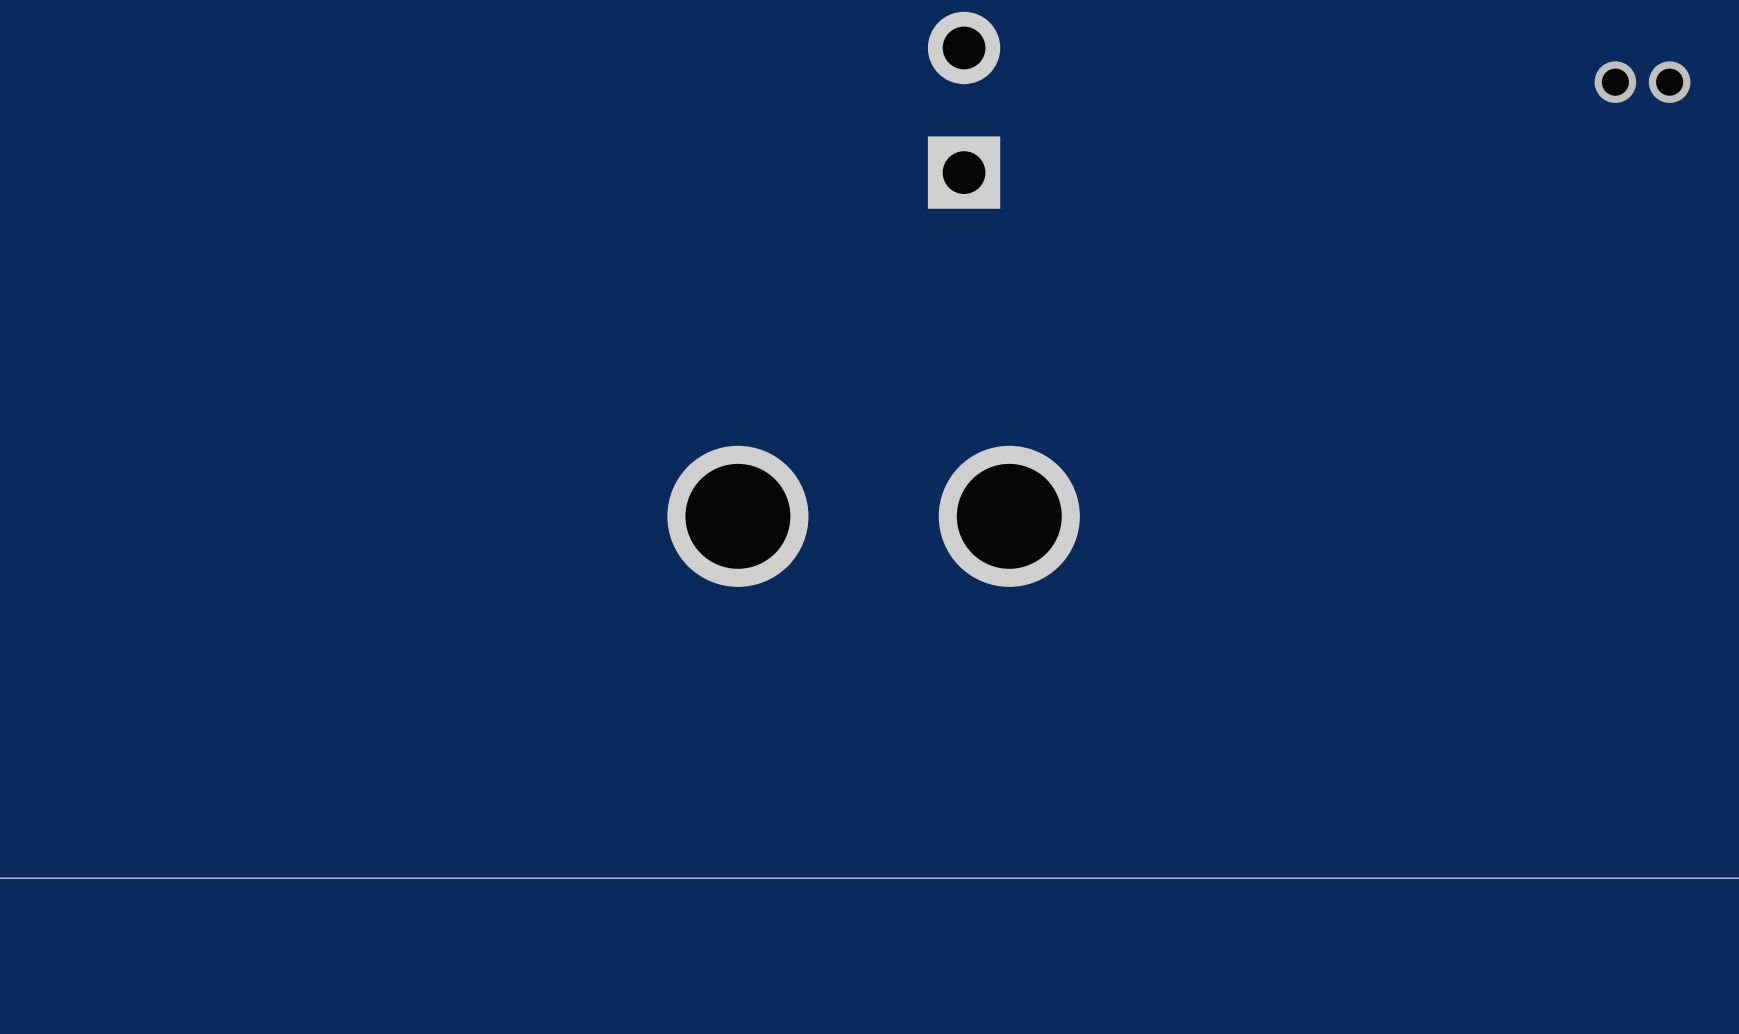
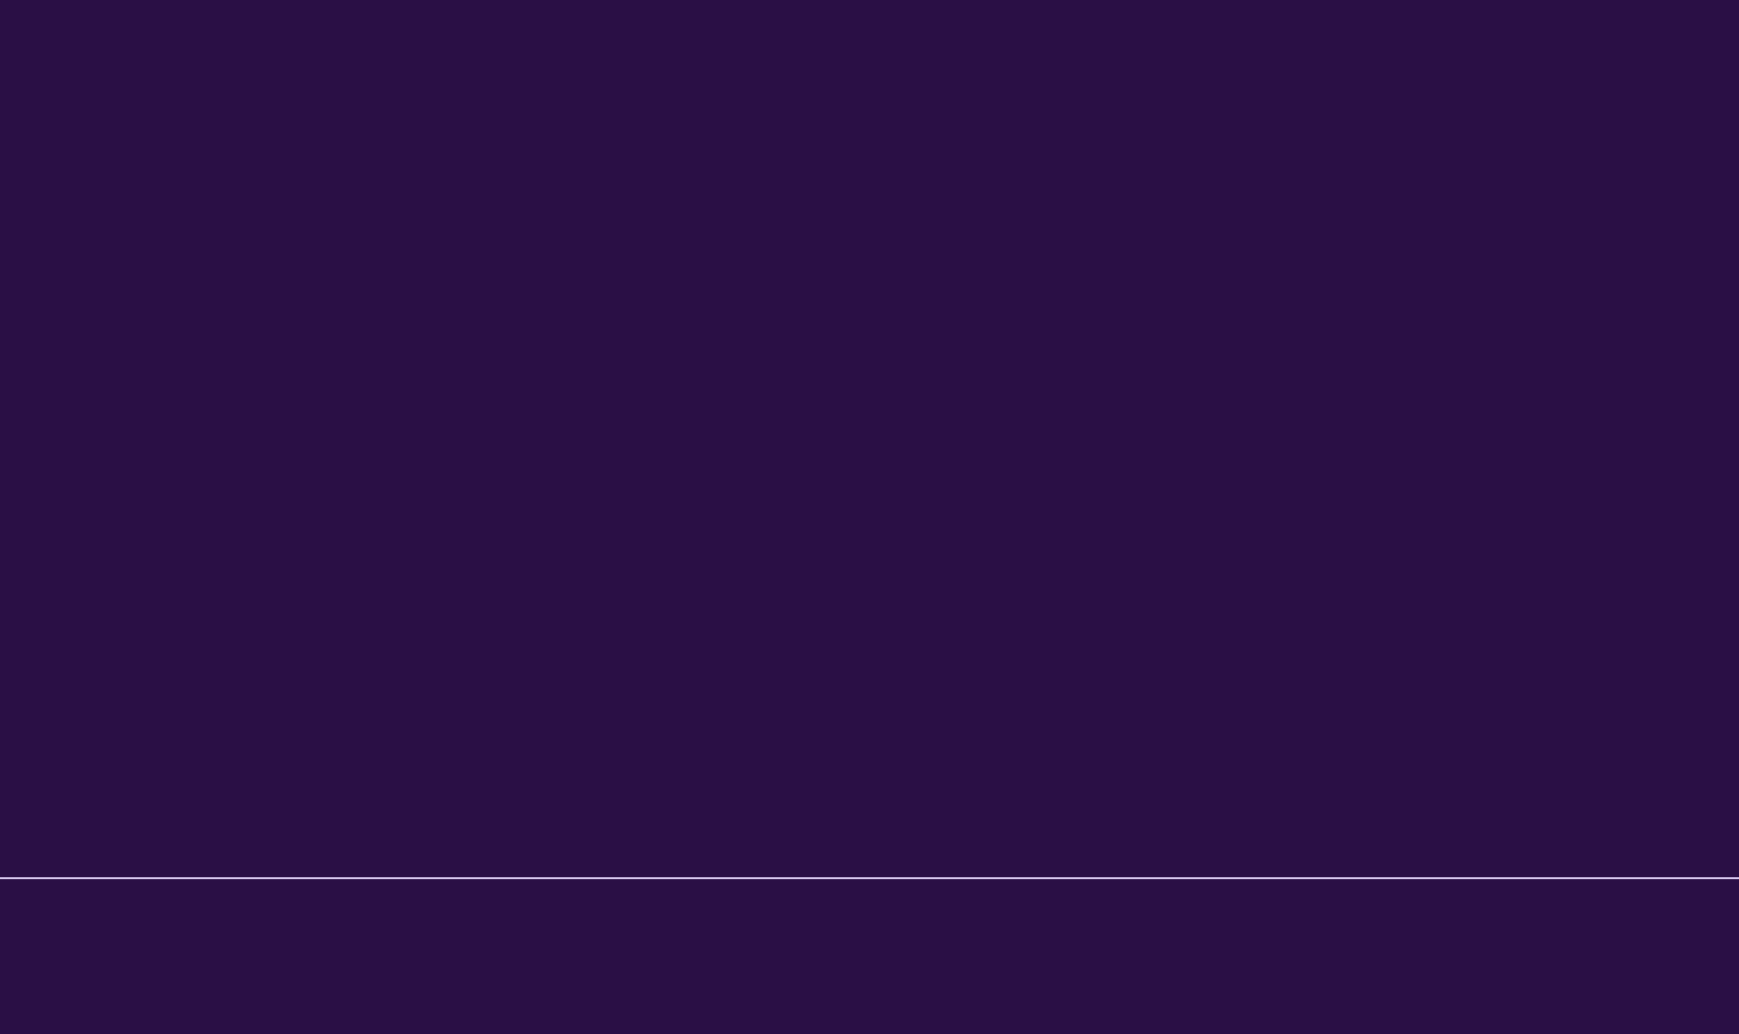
via: (1615, 82) -> none
via: (1669, 82) -> none
part: (964, 110) -> none
part: (737, 516) -> none
part: (1009, 516) -> none

